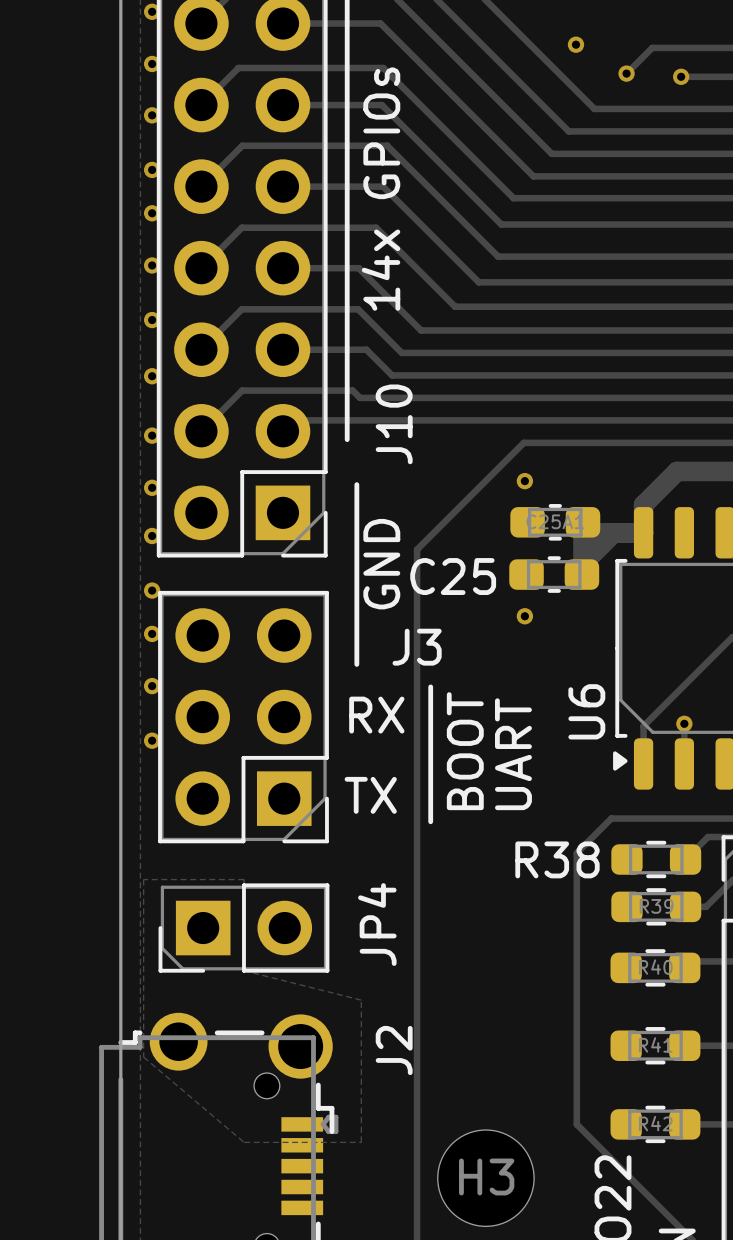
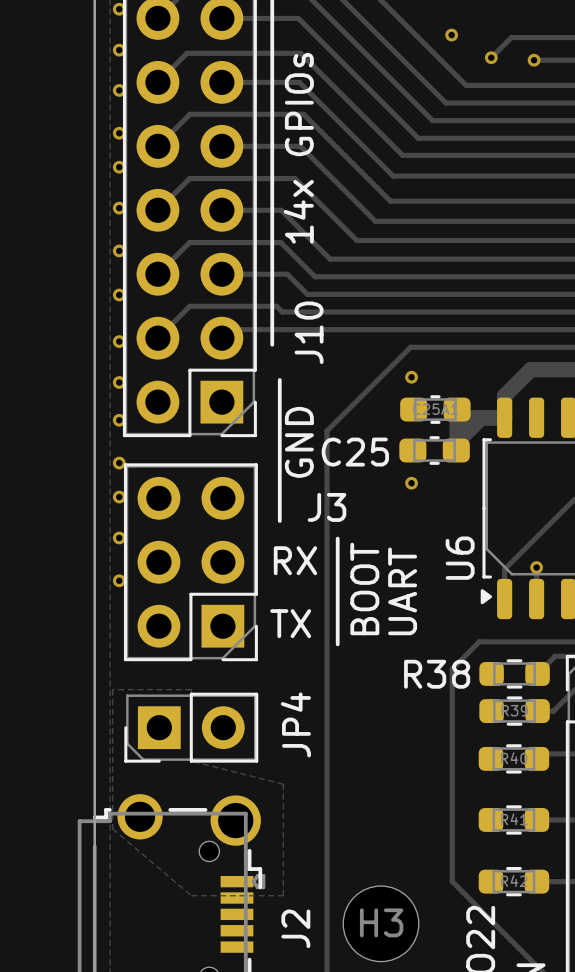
J2 name position: J2 (394, 1050) -> J2 (295, 928)

